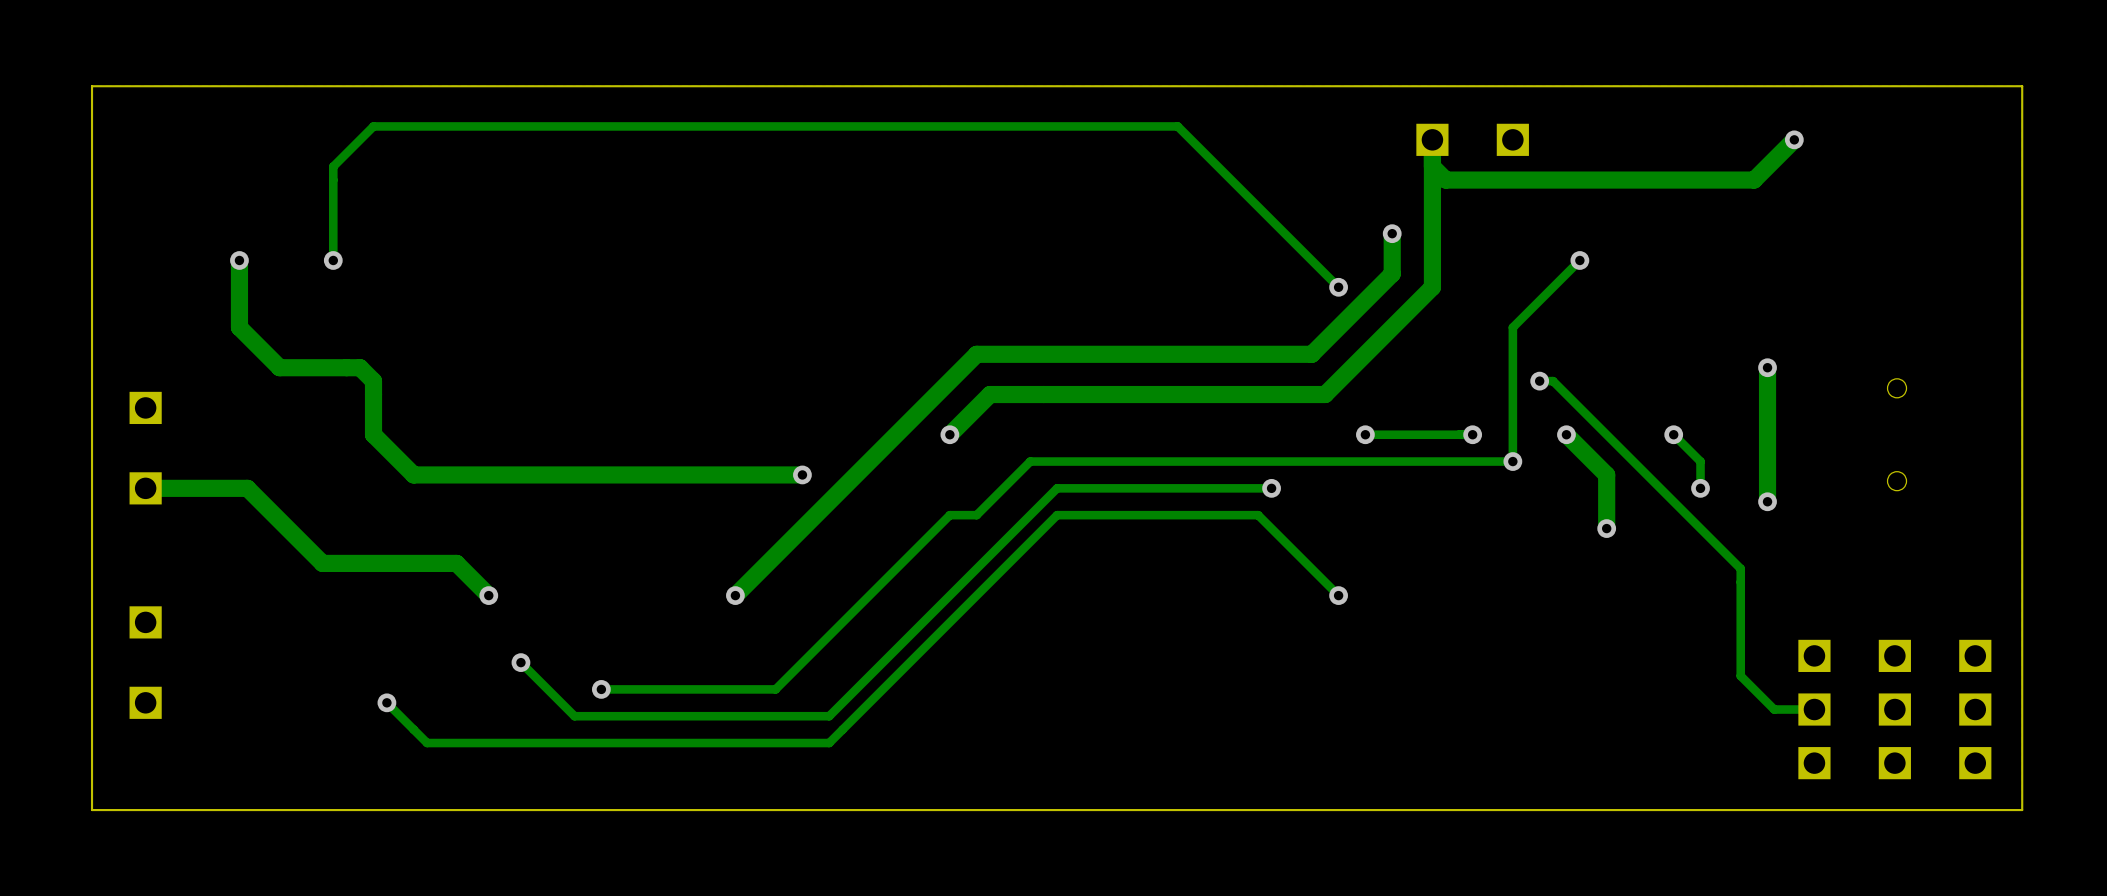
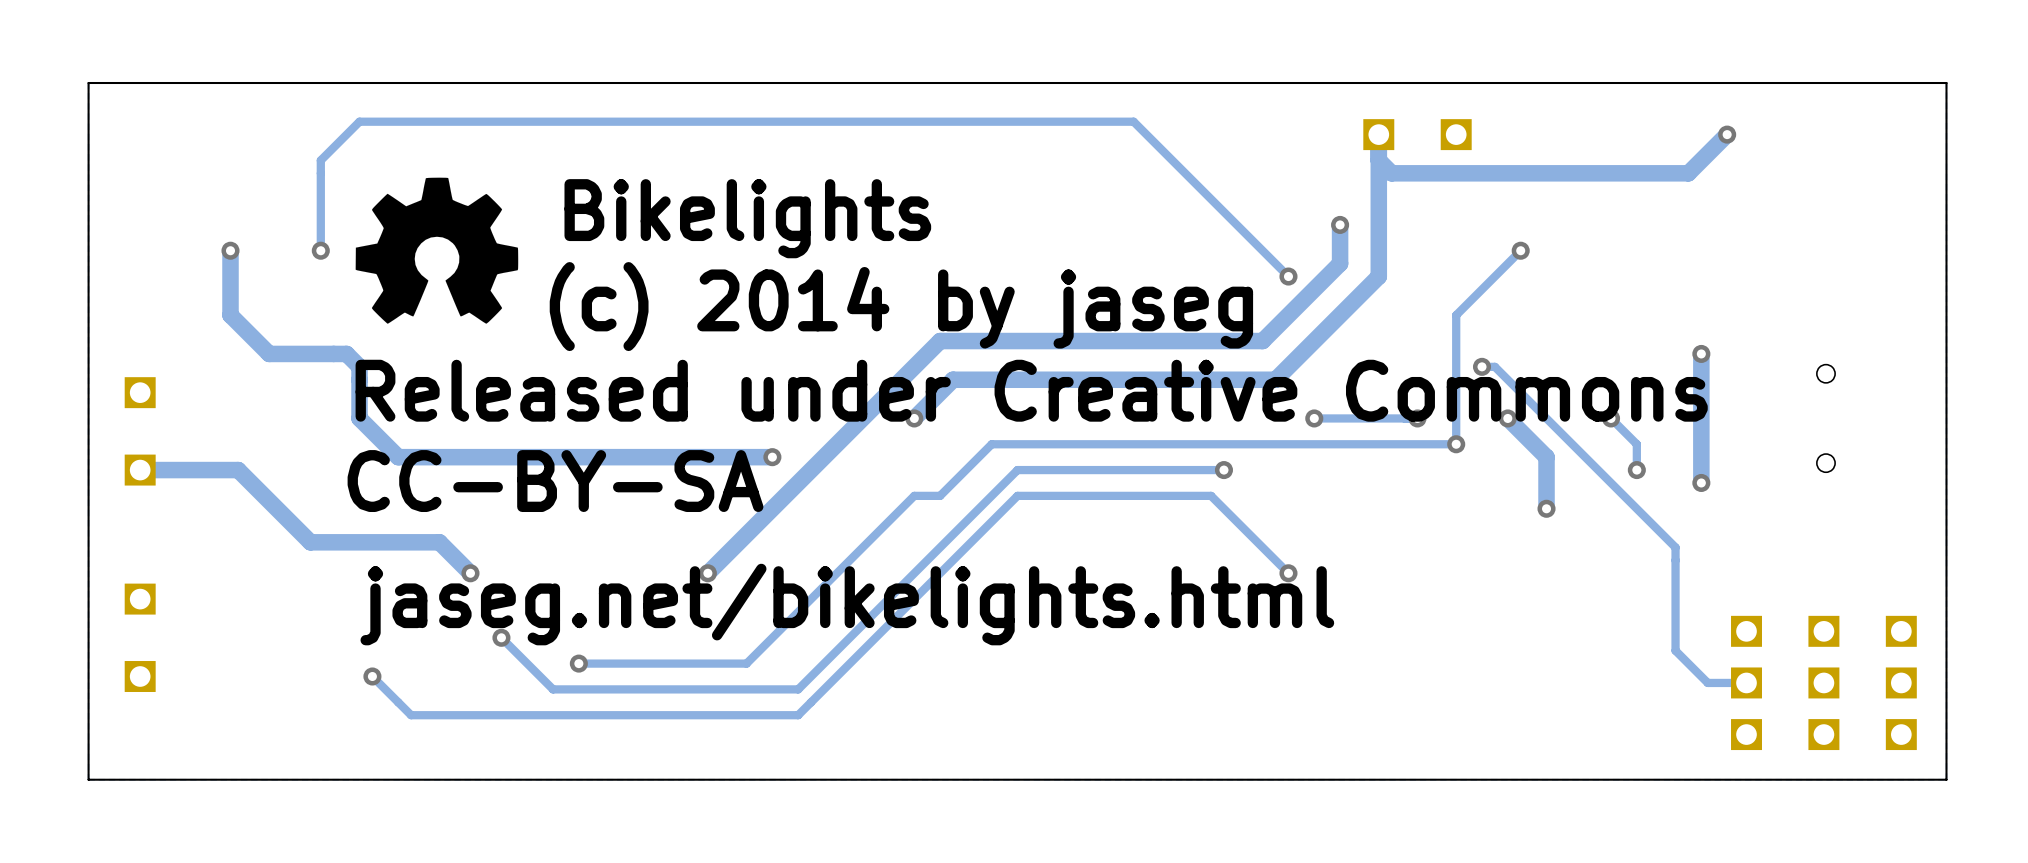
drawing: none -> [355, 177, 519, 324]
text: none -> Bikelights (747, 218)
text: none -> (c) 2014 by jaseg (901, 306)
text: none -> Released under Creative Commons (1031, 390)
text: none -> CC-BY-SA (555, 481)
text: none -> jaseg.net/bikelights.html (847, 604)

